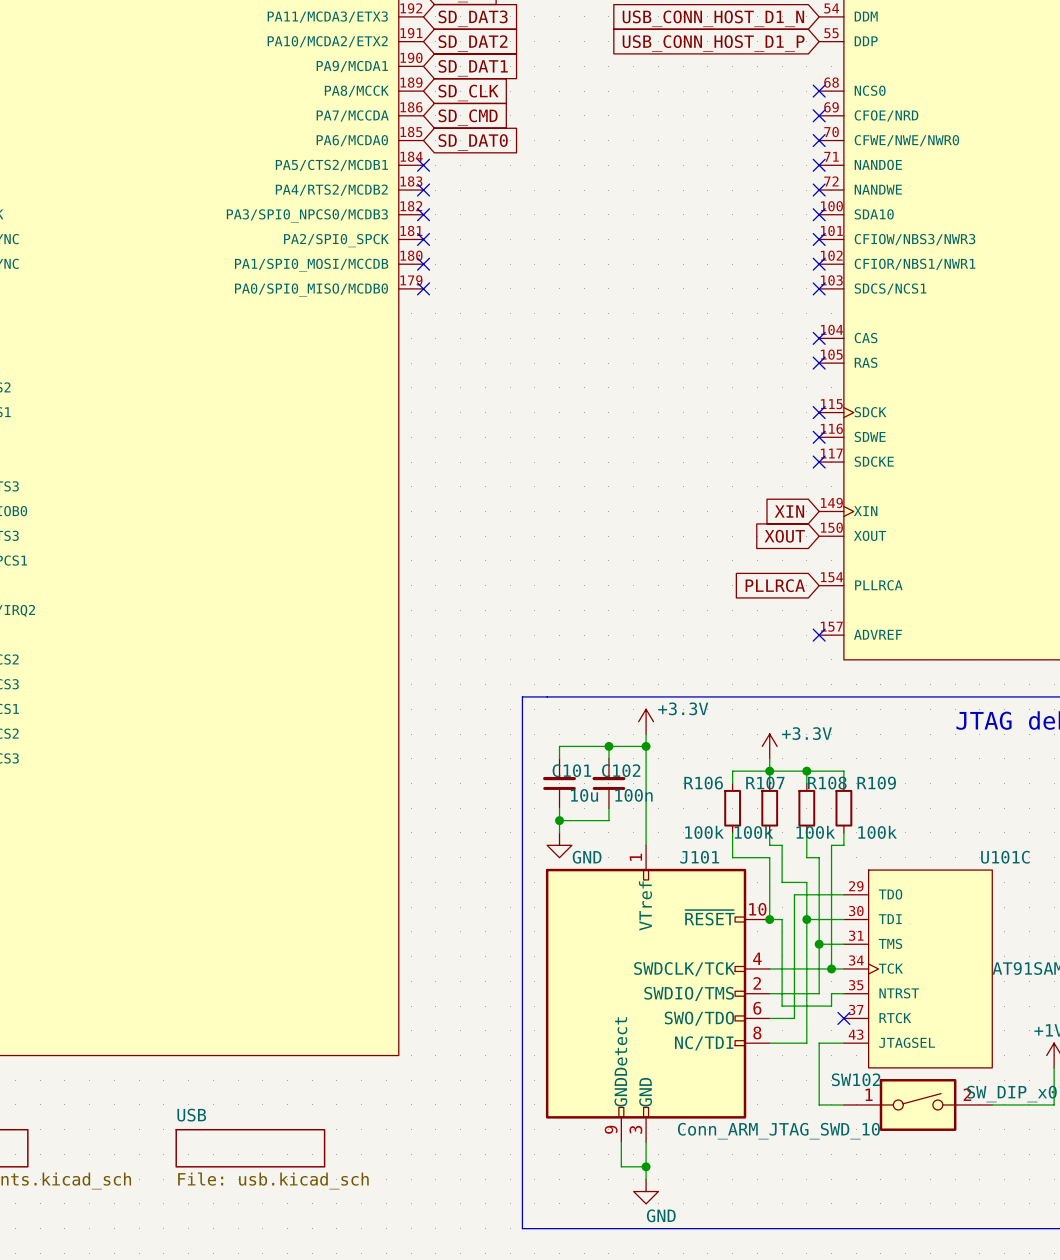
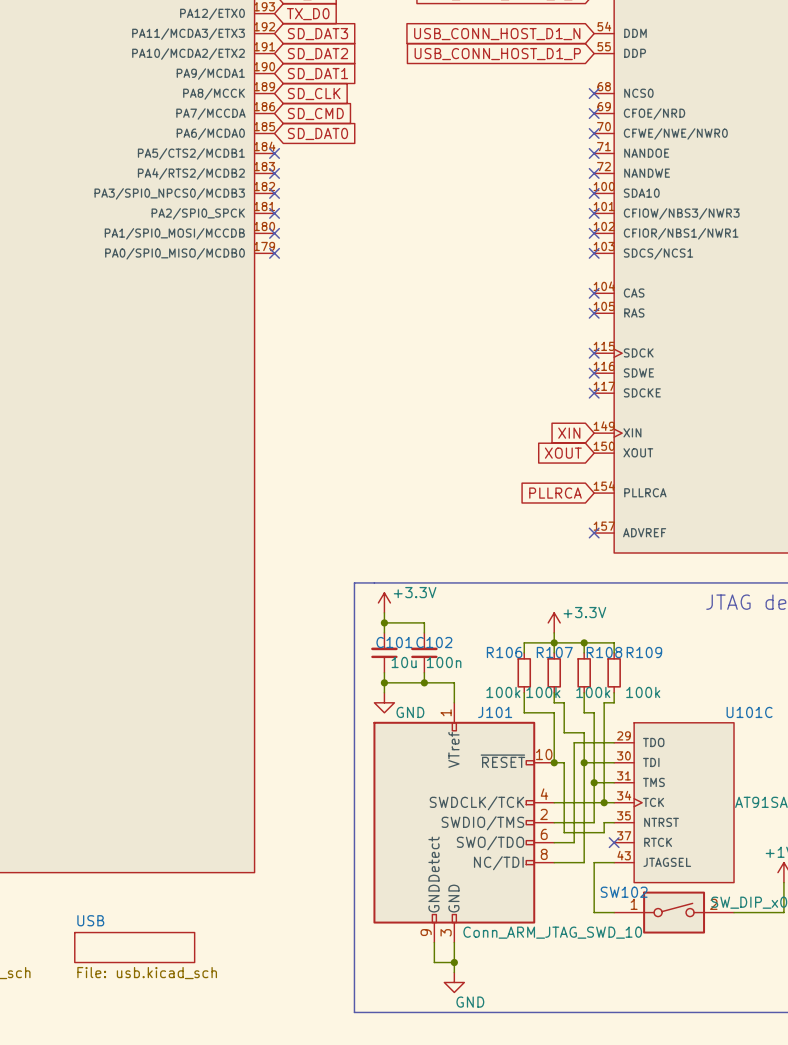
power symbol position: +3.3V (646, 721) -> +3.3V (384, 602)
wire: none -> (384, 612) (384, 622)
wire: (646, 734) (646, 820) -> (424, 682) (454, 682)
junction: none -> (384, 622)
wire: (608, 746) (646, 746) -> none
junction: (608, 746) -> none
junction: (646, 746) -> none
junction: none -> (424, 682)

